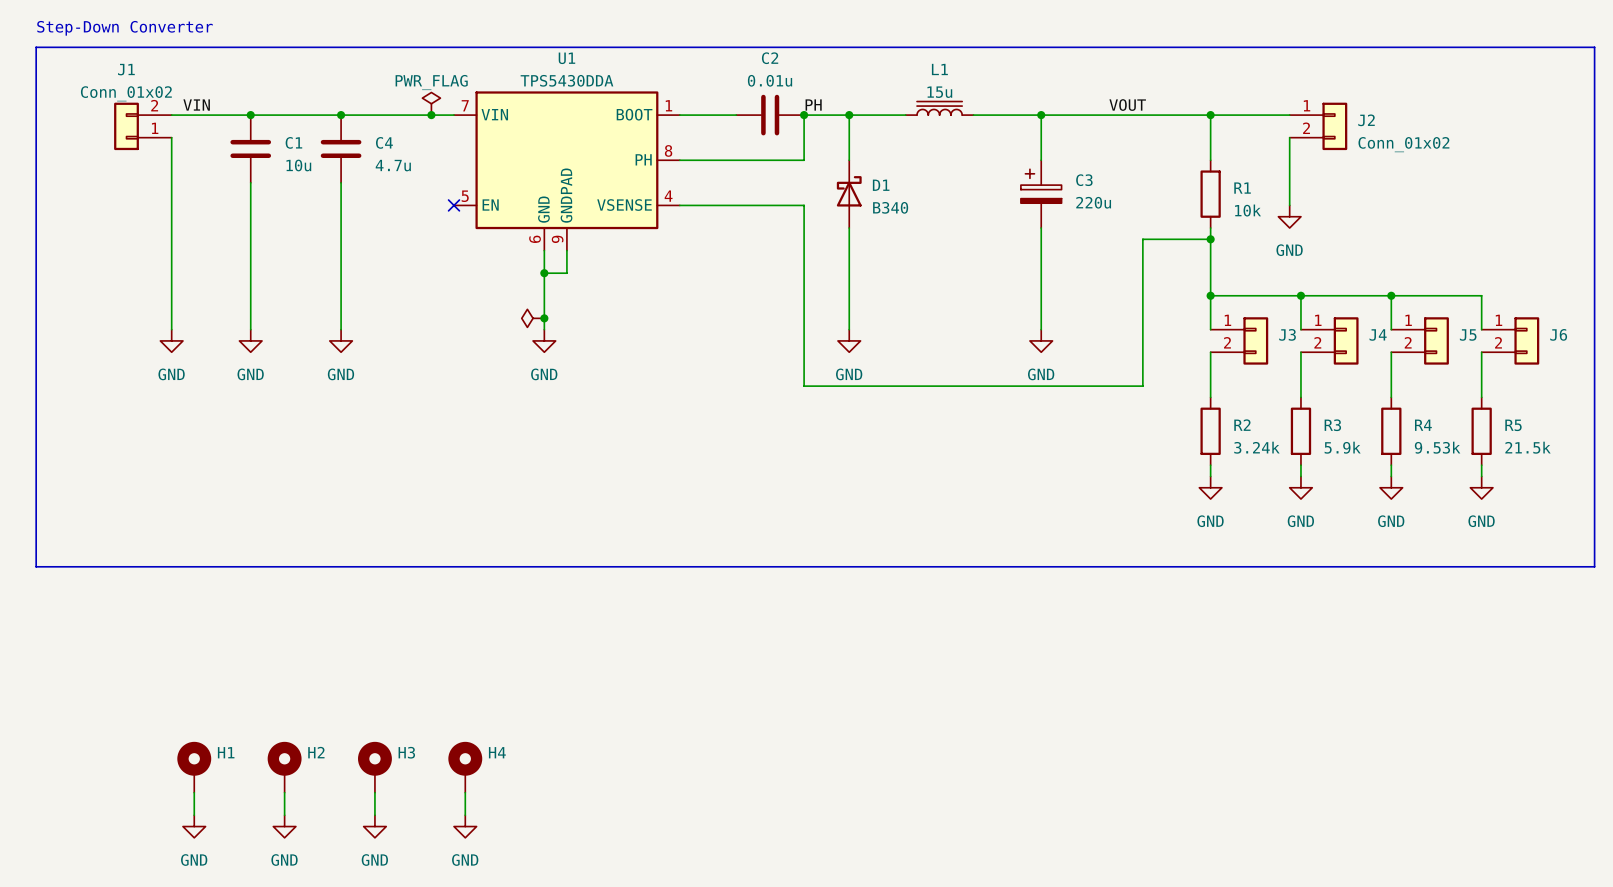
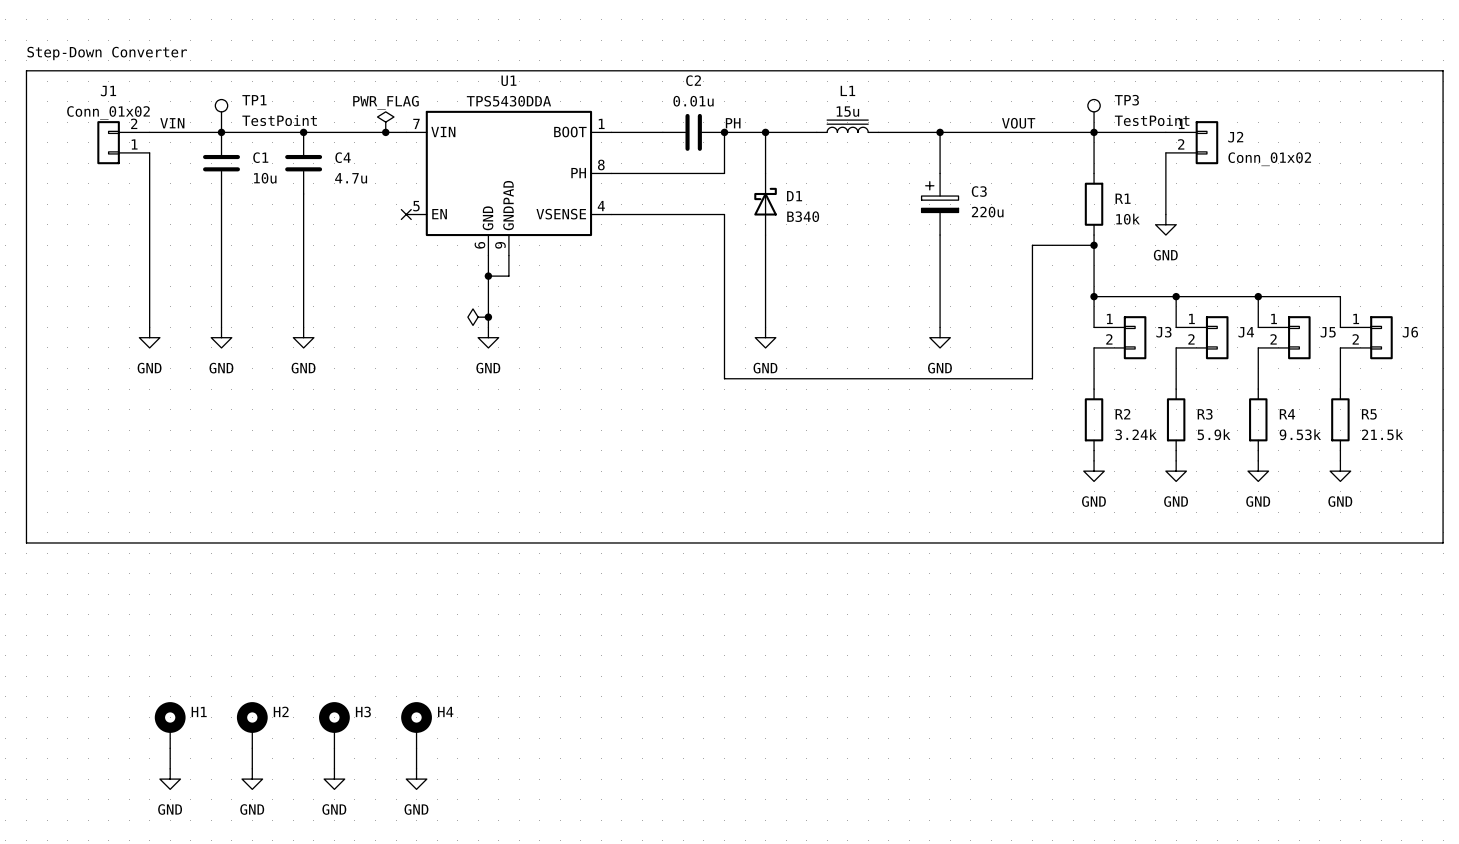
TP1: none -> TestPoint (221, 115)
TP3: none -> TestPoint (1094, 115)

